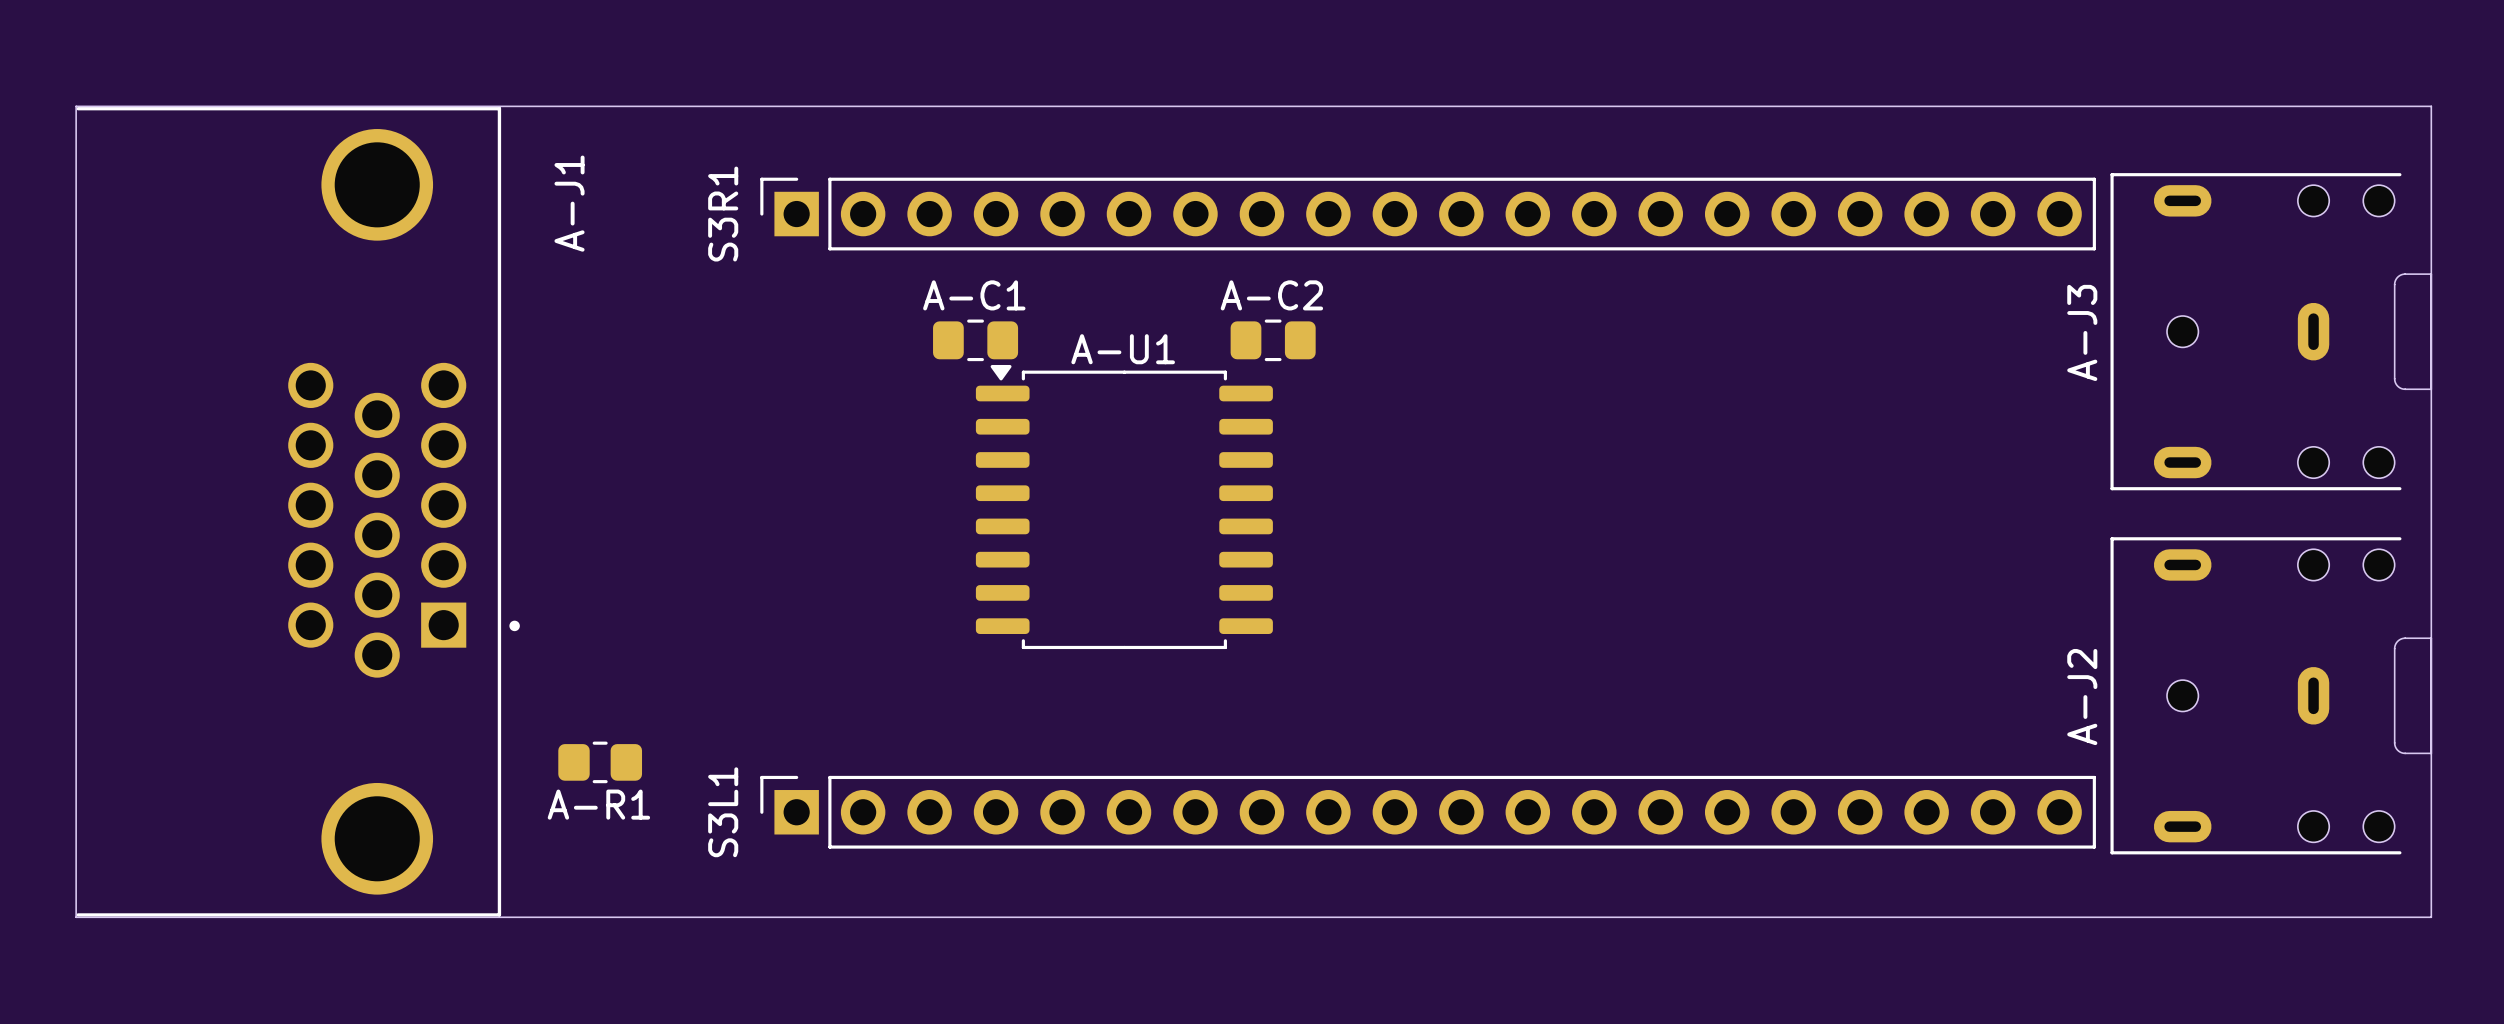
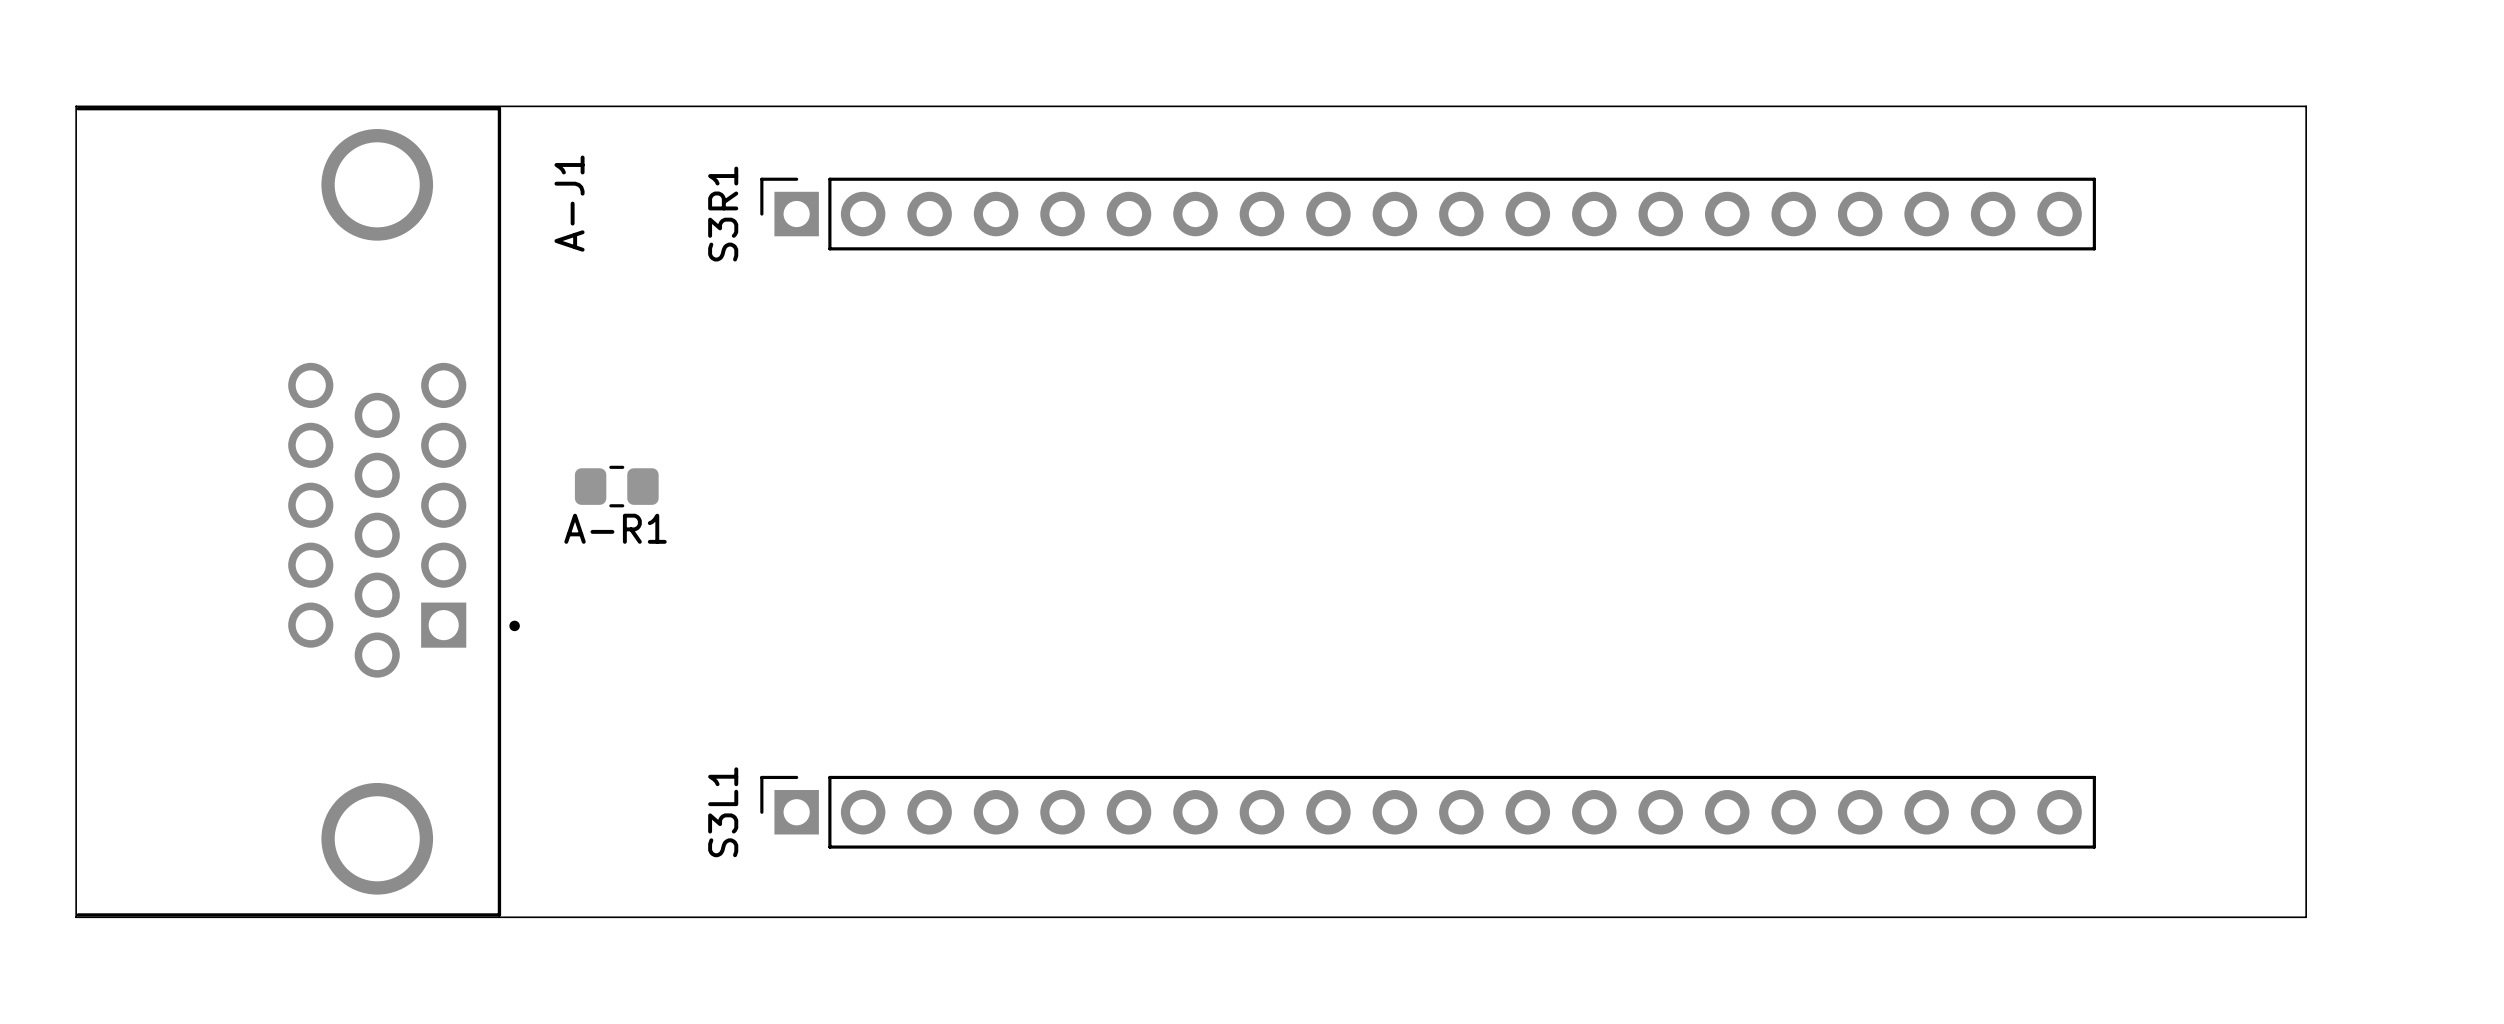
board edge: (2306, 106) (2431, 106) (2431, 917) (2306, 917) -> (2306, 106) (2306, 917)
A-J3: (2271, 331) -> none
A-C1: (975, 340) -> none
A-C2: (1273, 340) -> none
A-U1: (1124, 507) -> none
A-J2: (2271, 695) -> none
A-R1 position: (600, 762) -> (616, 486)

